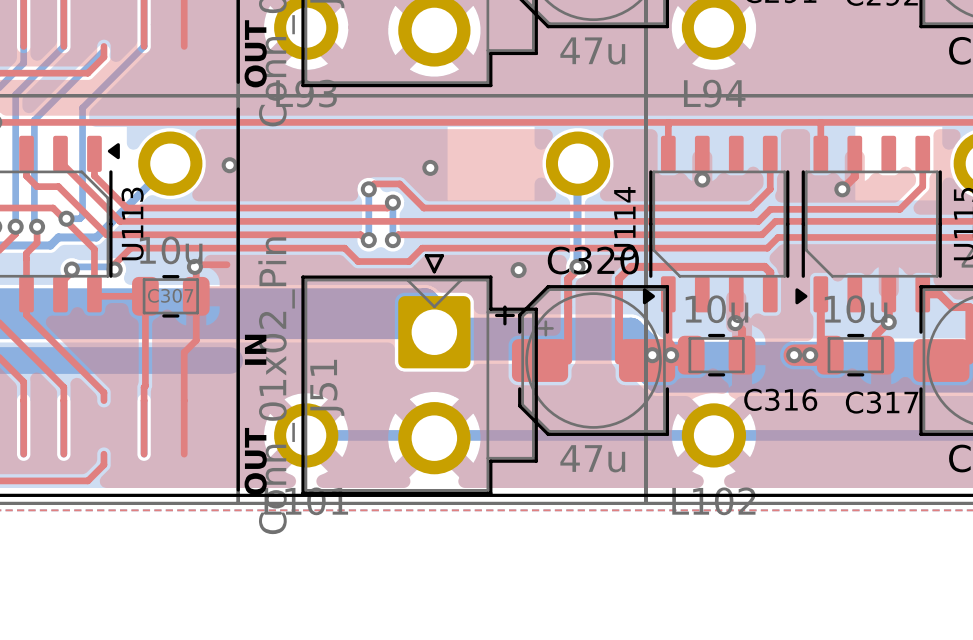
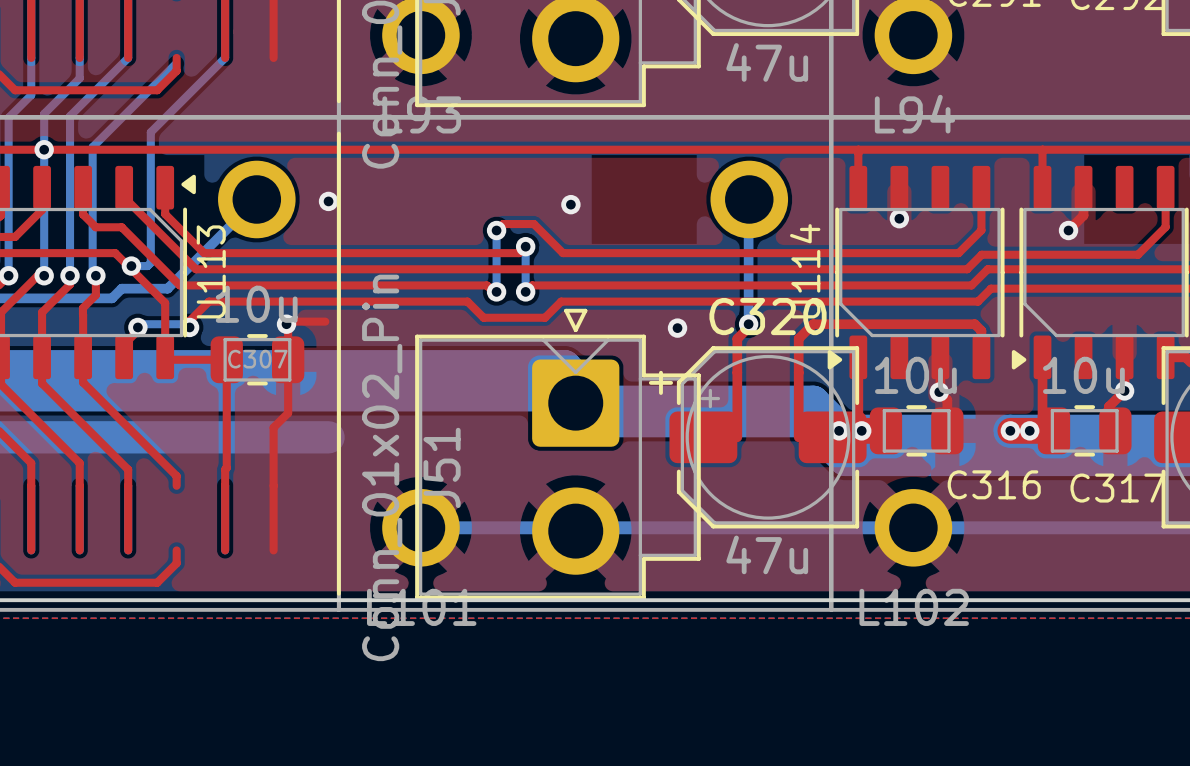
text: OUT (255, 53) -> none
text: IN (255, 349) -> none
text: OUT (255, 461) -> none

